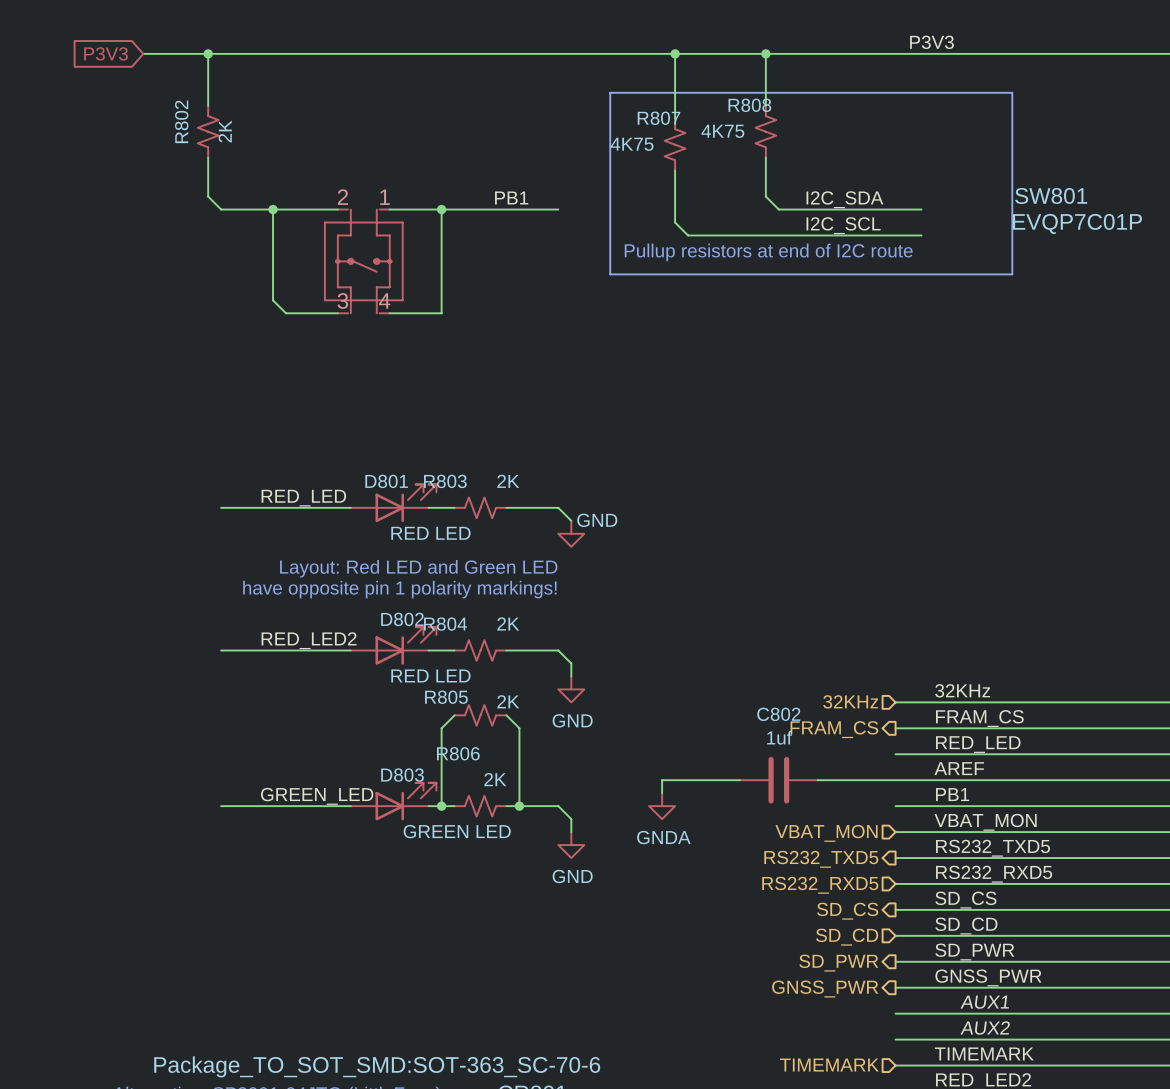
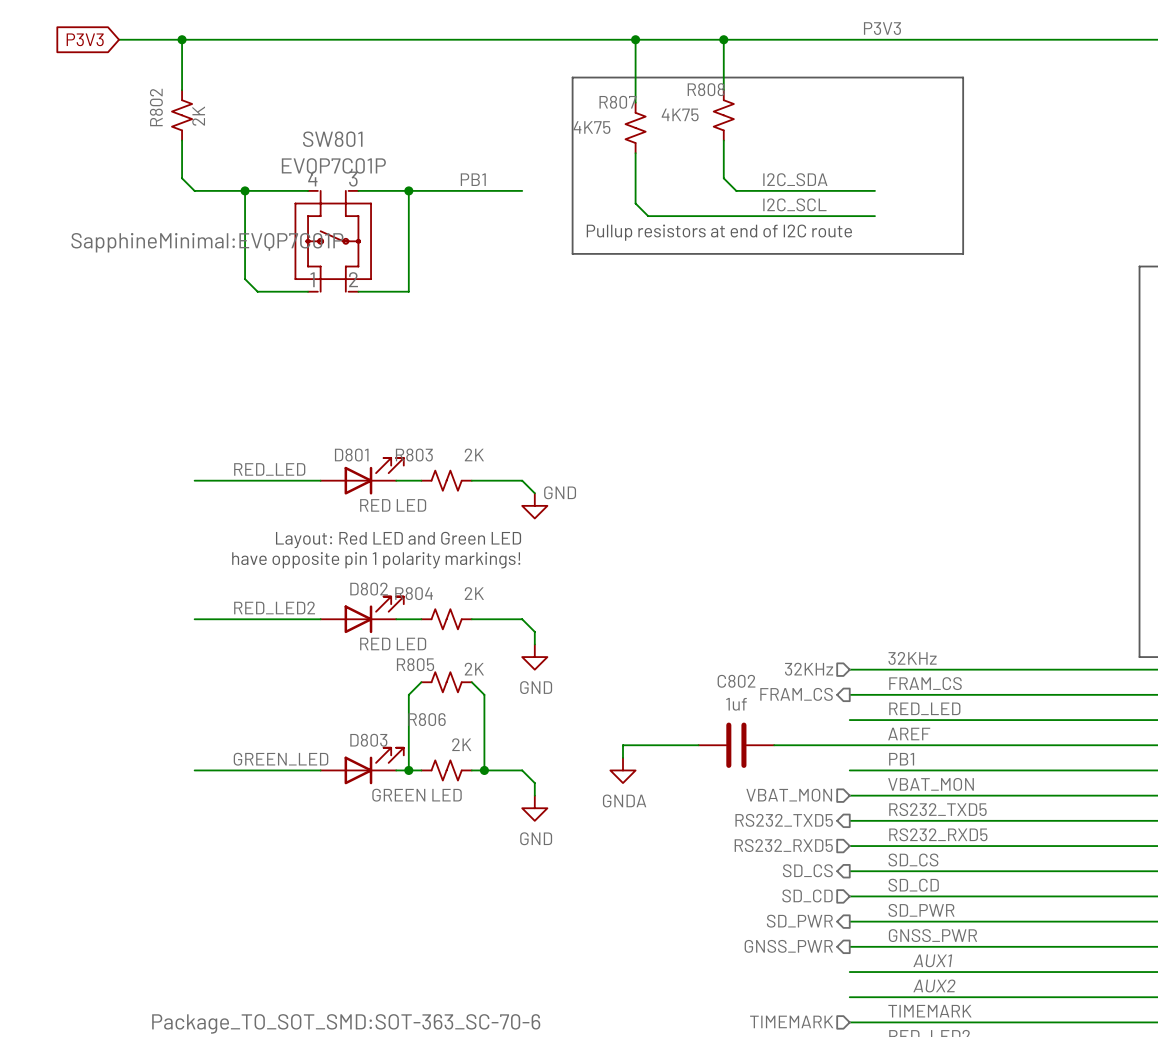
SW801 name position: SW801 (1051, 195) -> SW801 (332, 139)
SW801 value position: EVQP7C01P (1077, 223) -> EVQP7C01P (333, 167)
SW801 rotation: 0° (363, 261) -> 180° (333, 241)
SW801 text: none -> SapphineMinimal:EVQP7C01P (207, 242)

